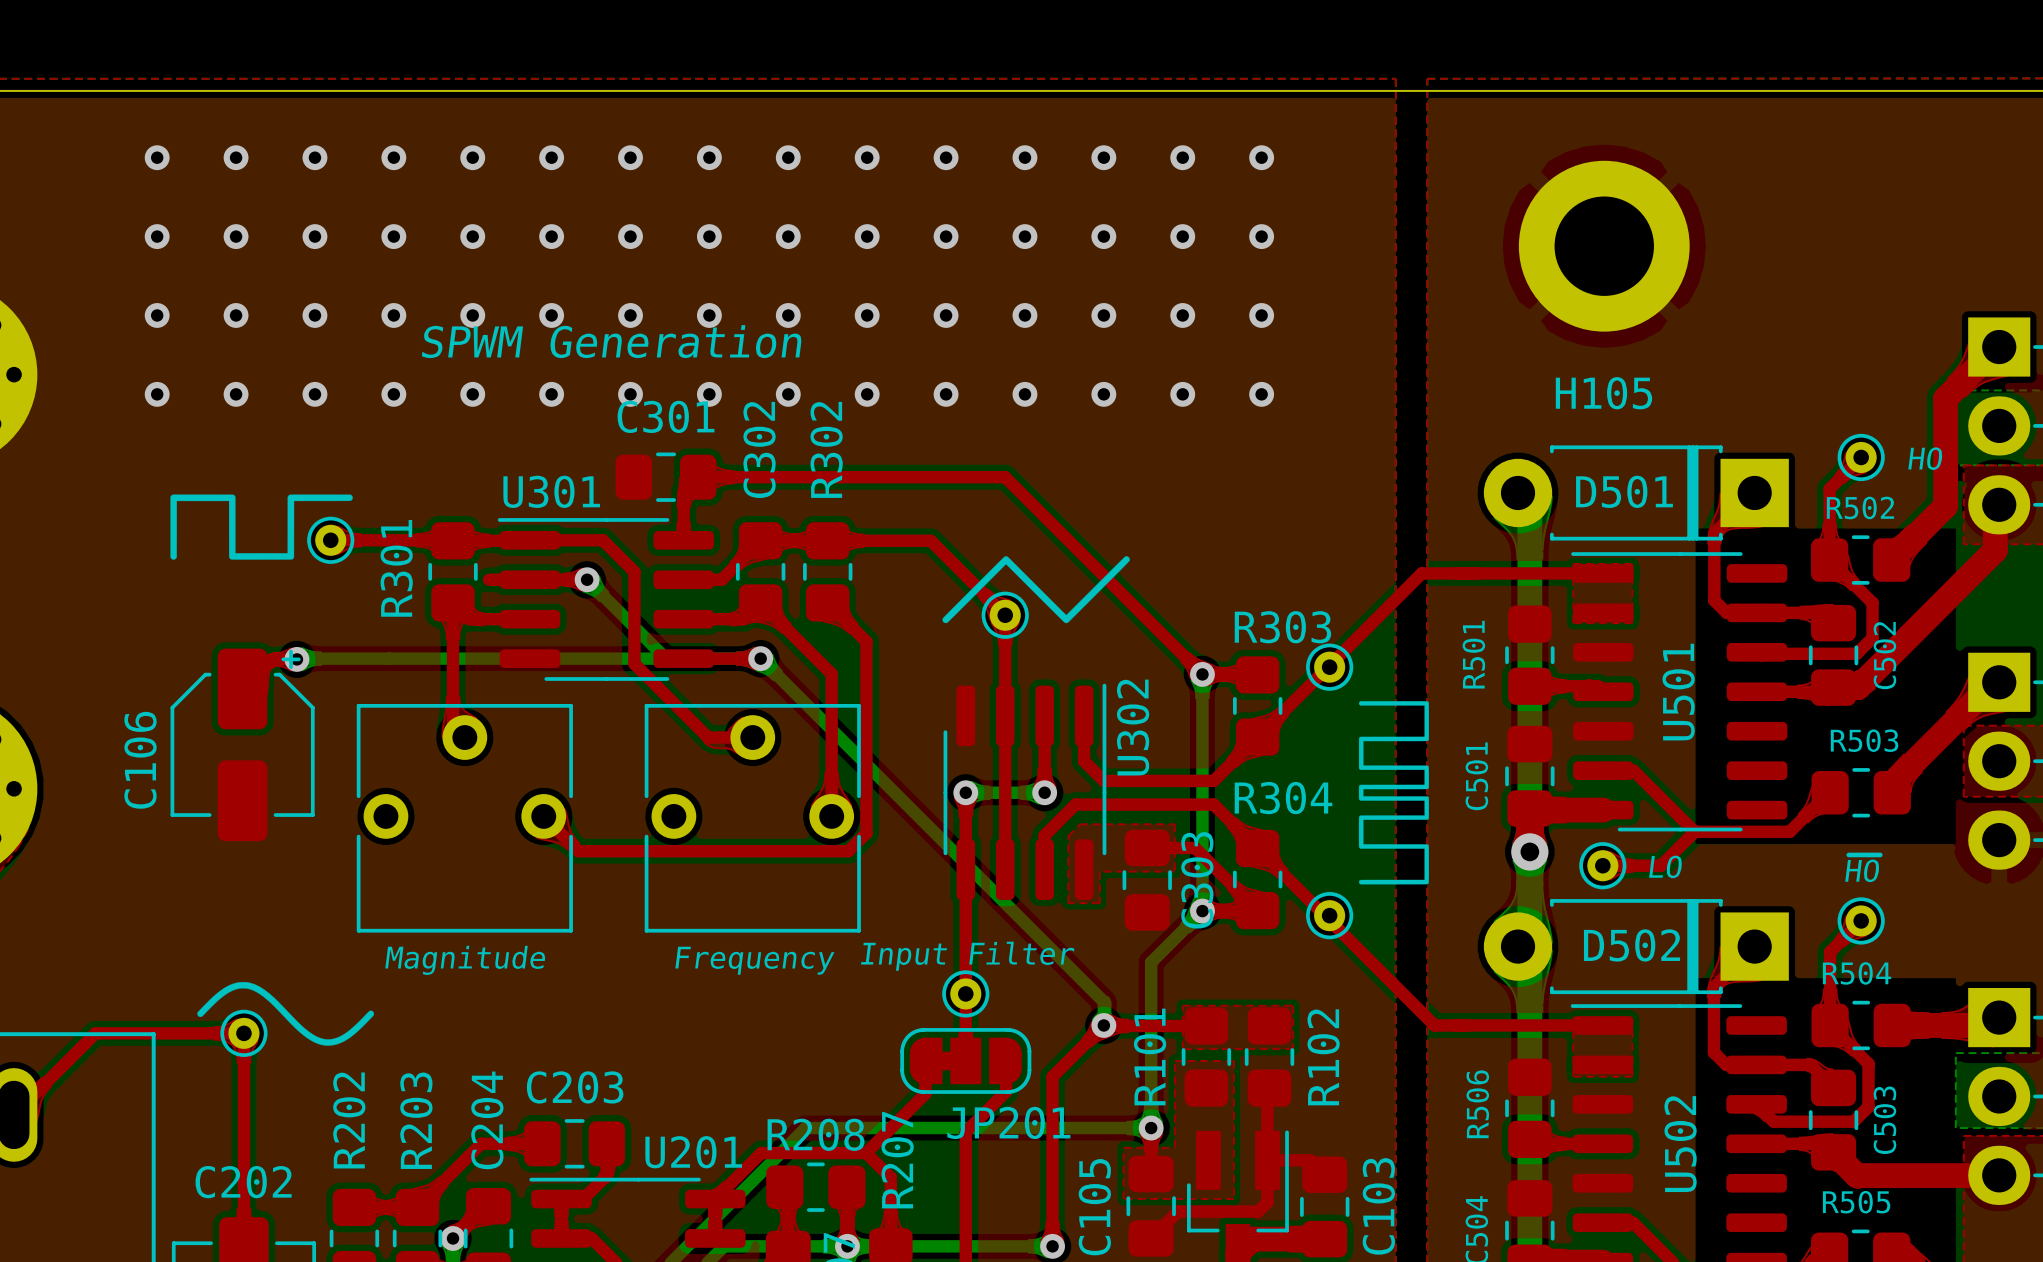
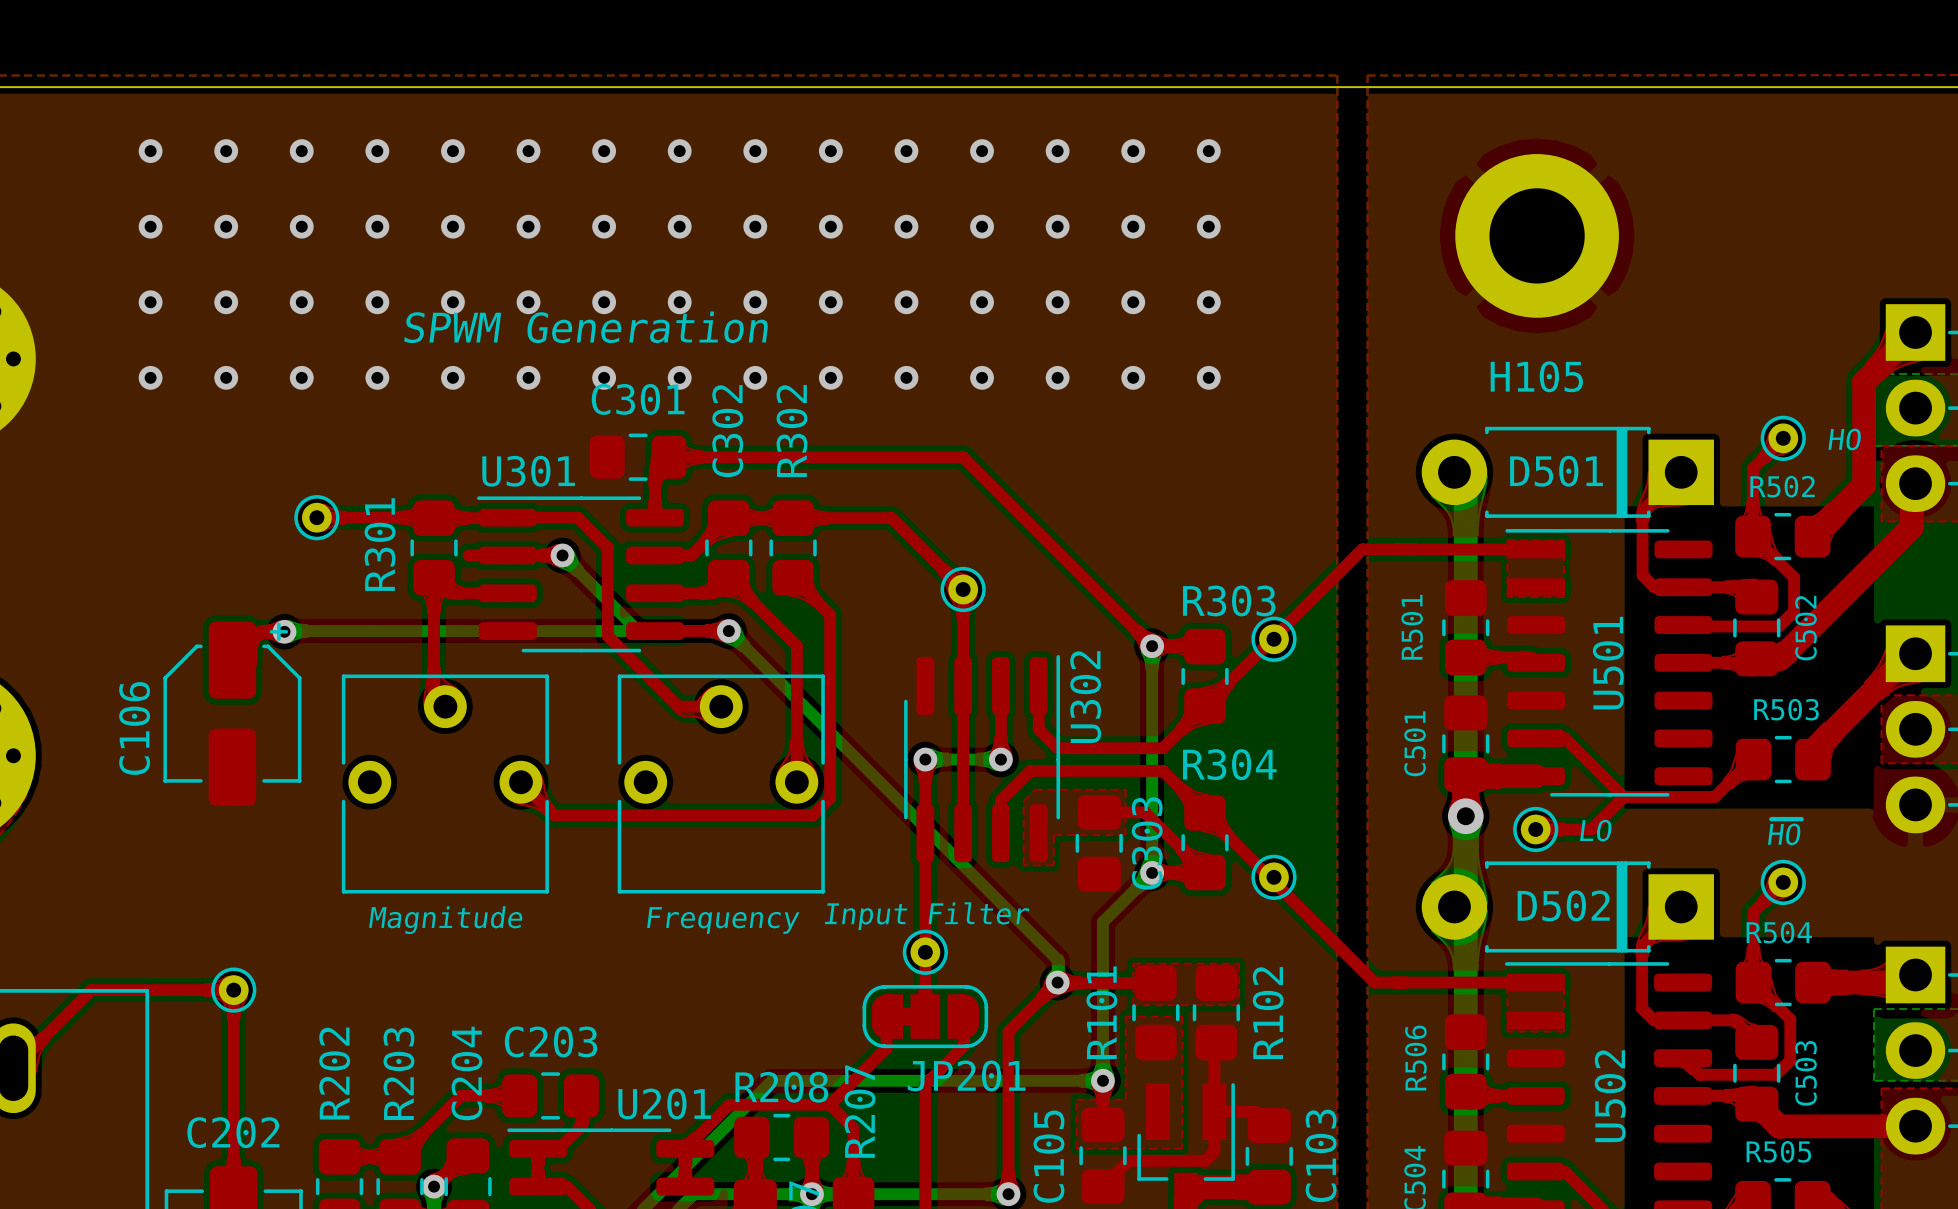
drawing: [170, 494, 353, 560] -> none
drawing: [942, 556, 1130, 624] -> none
drawing: [1358, 701, 1430, 885] -> none
drawing: [197, 981, 375, 1046] -> none

